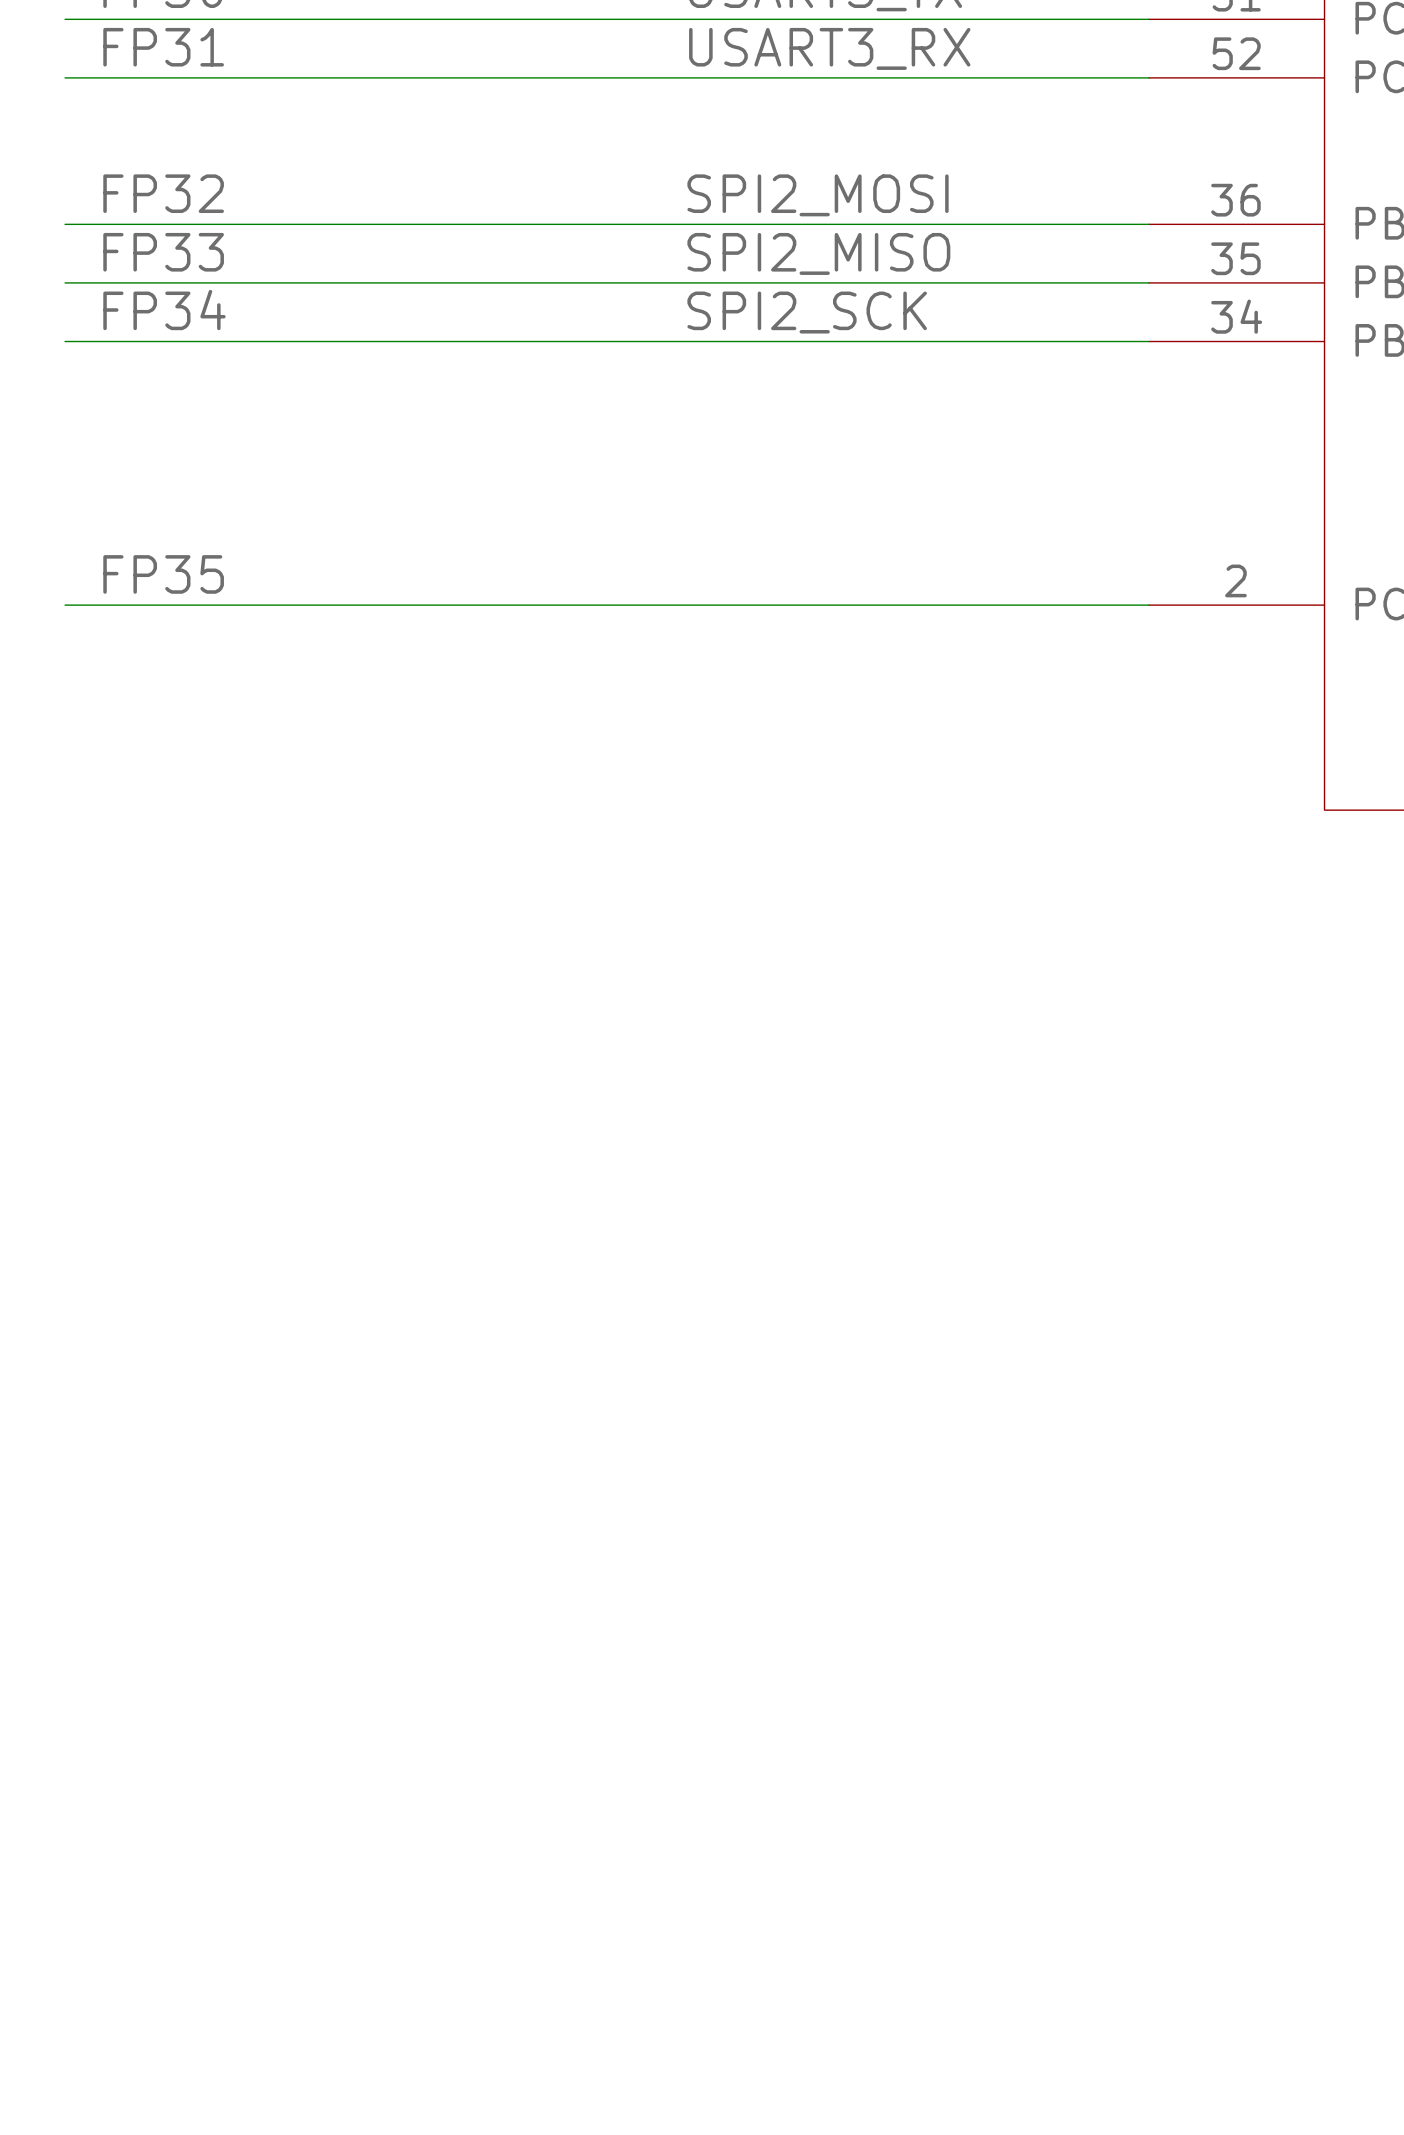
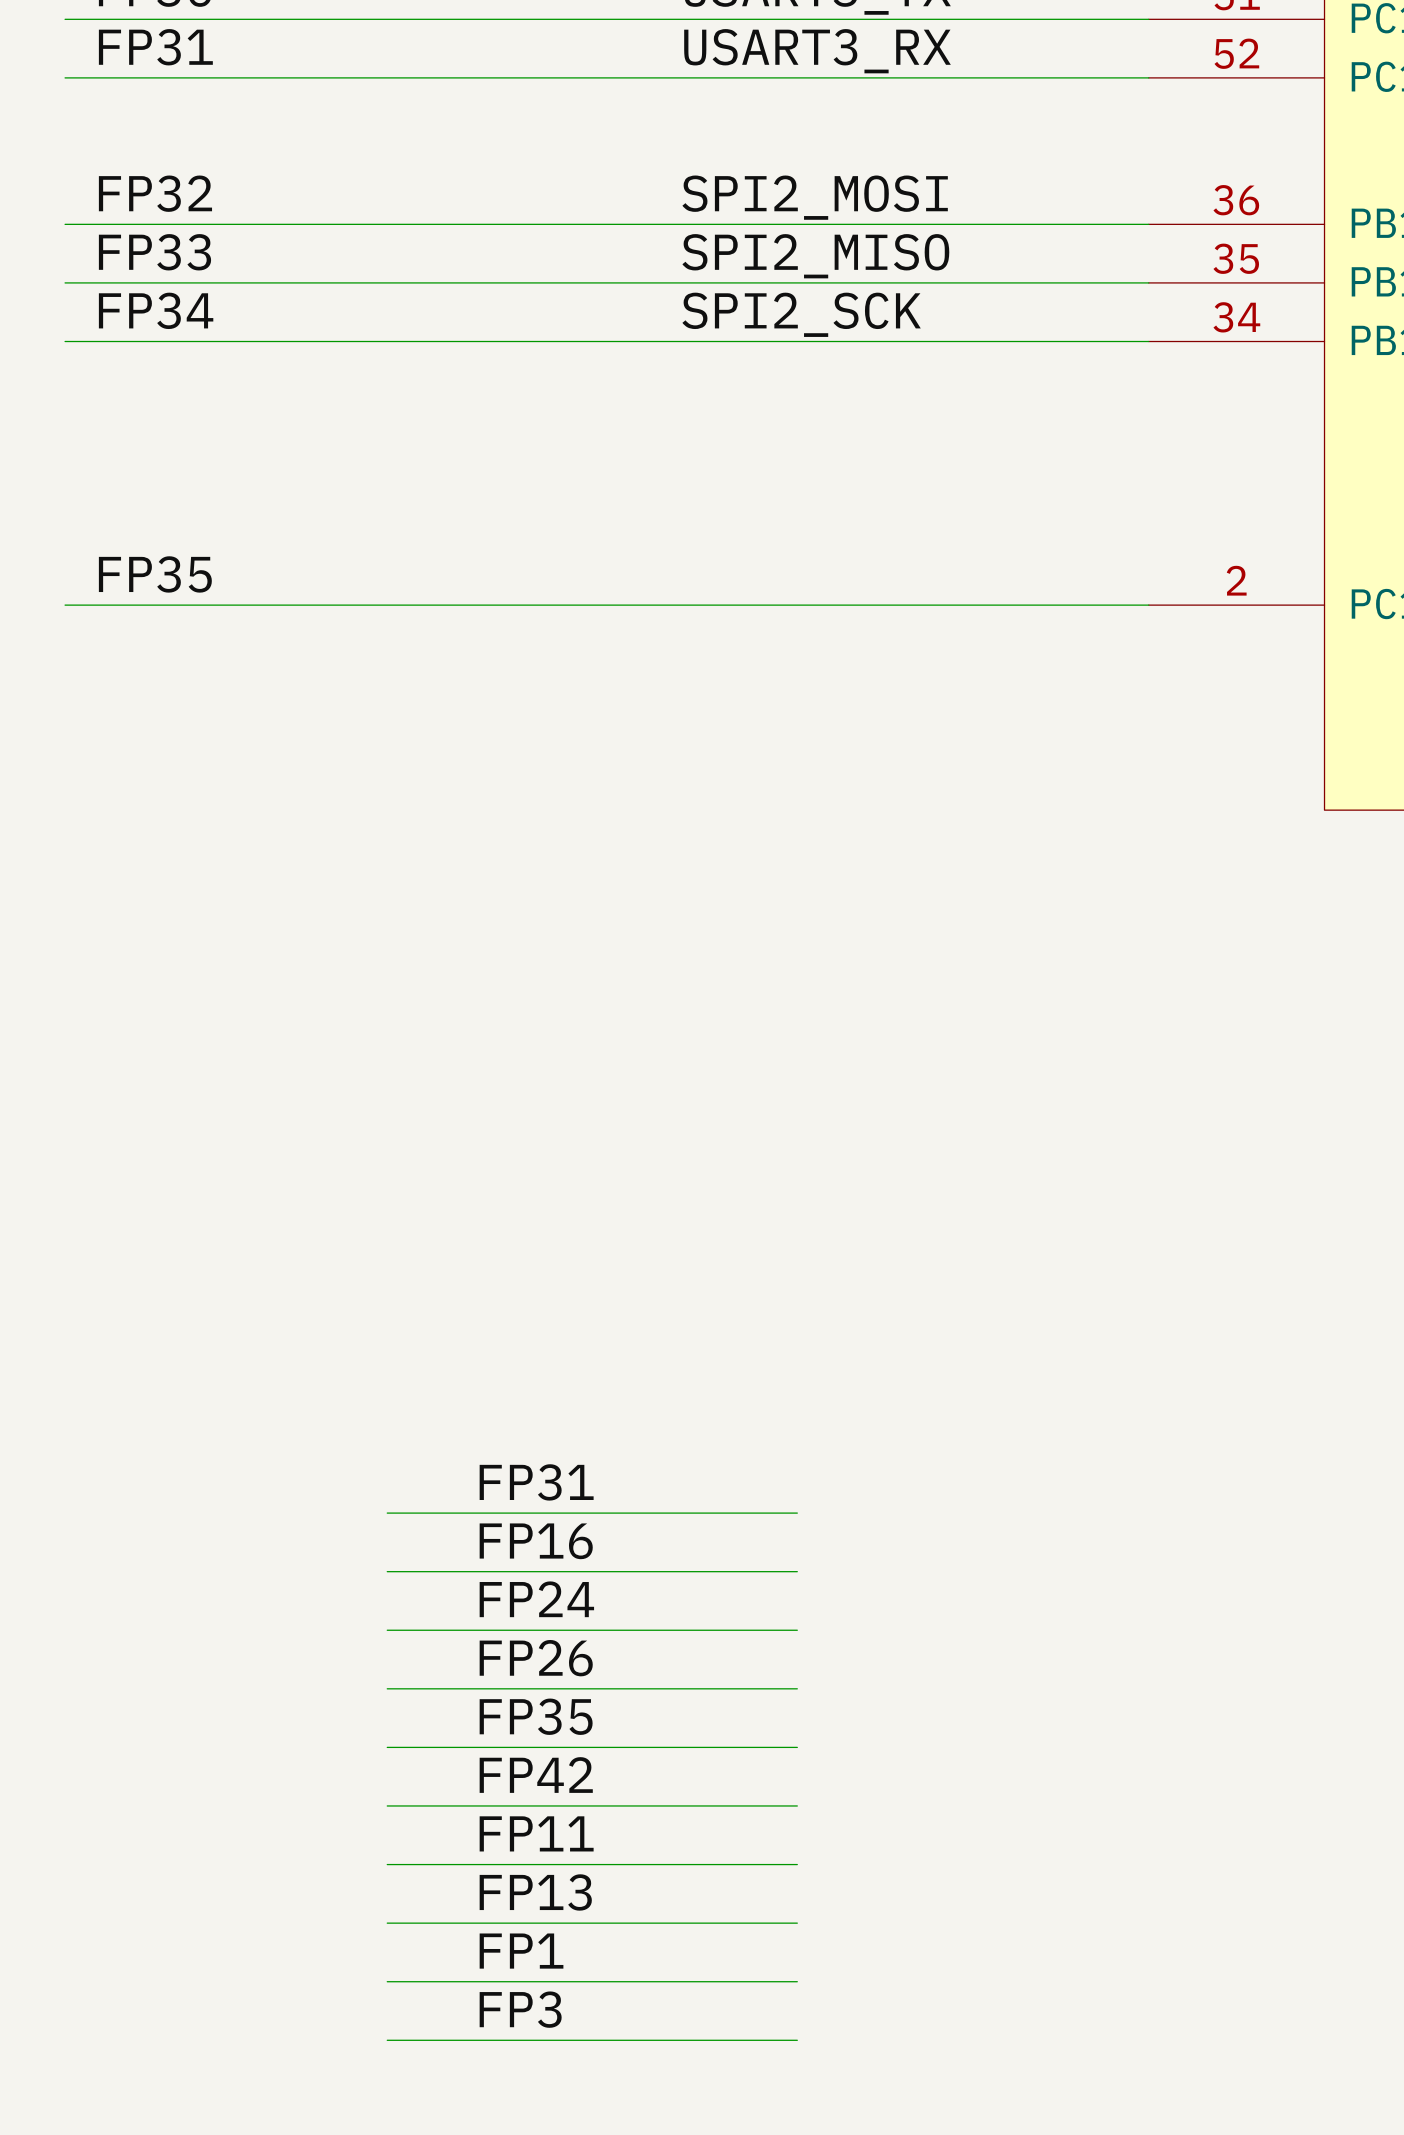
label: none -> FP31 (536, 1482)
wire: none -> (387, 1513) (797, 1513)
label: none -> FP16 (536, 1541)
wire: none -> (387, 1571) (797, 1571)
label: none -> FP24 (536, 1599)
wire: none -> (387, 1630) (797, 1630)
label: none -> FP26 (536, 1658)
wire: none -> (387, 1688) (797, 1688)
label: none -> FP35 (536, 1716)
wire: none -> (387, 1747) (797, 1747)
label: none -> FP42 (536, 1775)
wire: none -> (387, 1805) (797, 1805)
label: none -> FP11 (536, 1833)
wire: none -> (387, 1864) (797, 1864)
label: none -> FP13 (535, 1892)
wire: none -> (387, 1923) (797, 1923)
label: none -> FP1 (521, 1951)
wire: none -> (387, 1981) (797, 1981)
label: none -> FP3 (520, 2009)
wire: none -> (387, 2040) (797, 2040)

